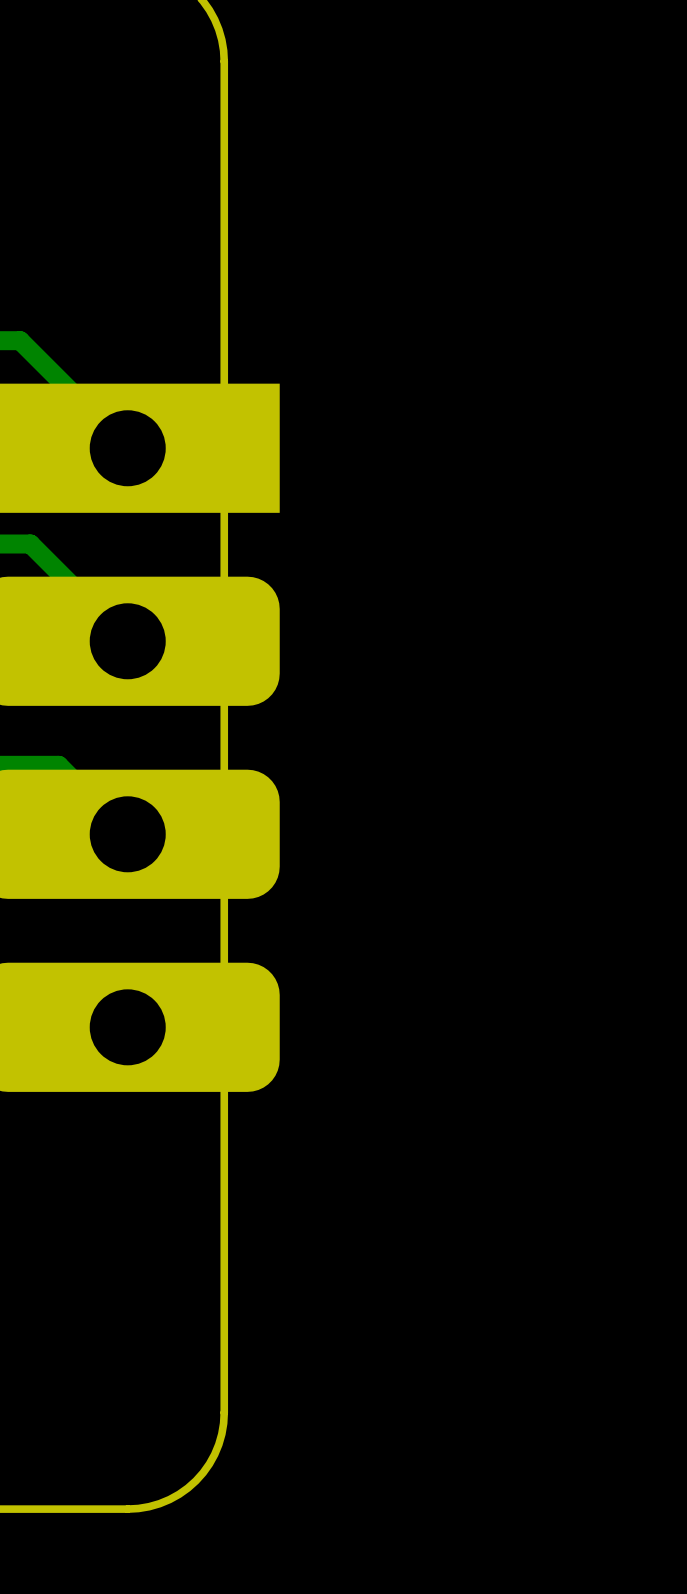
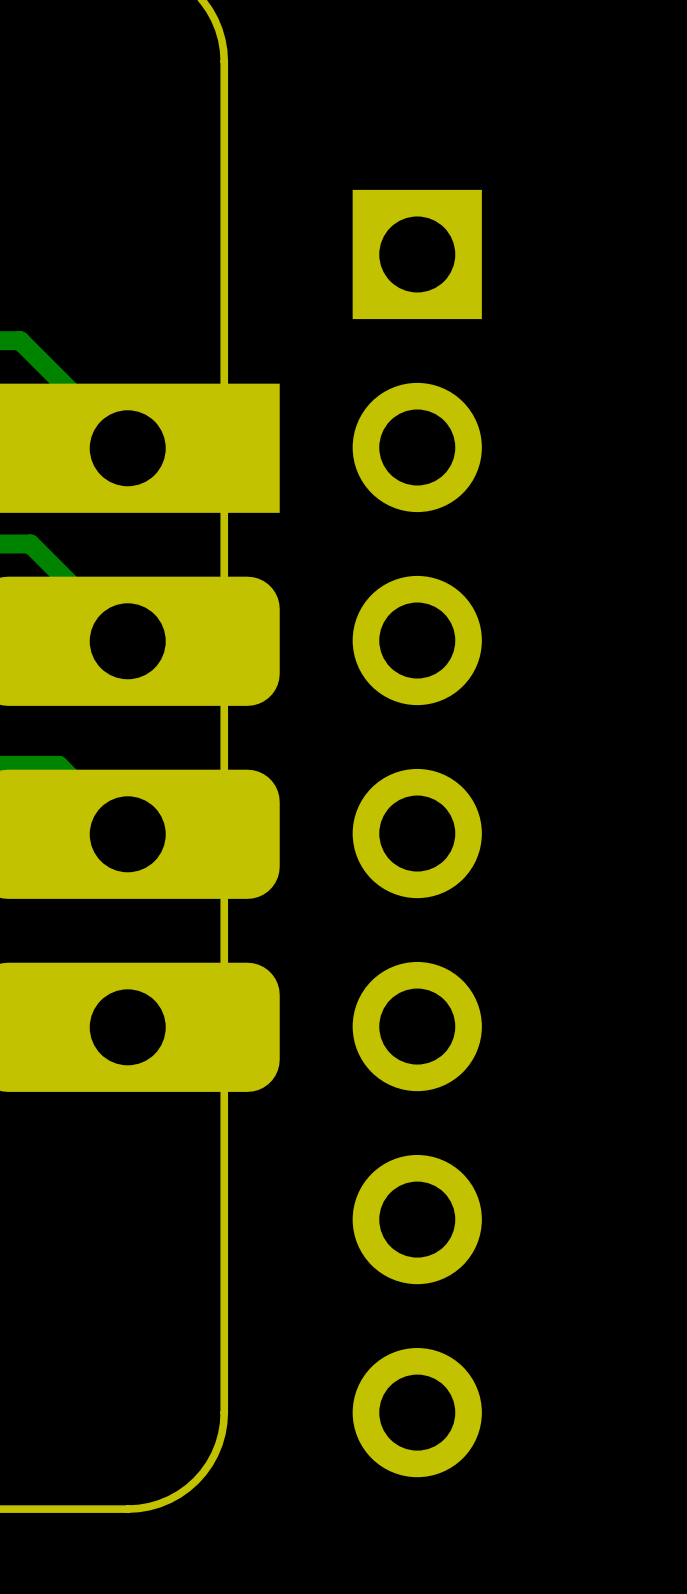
part: none -> (417, 833)

